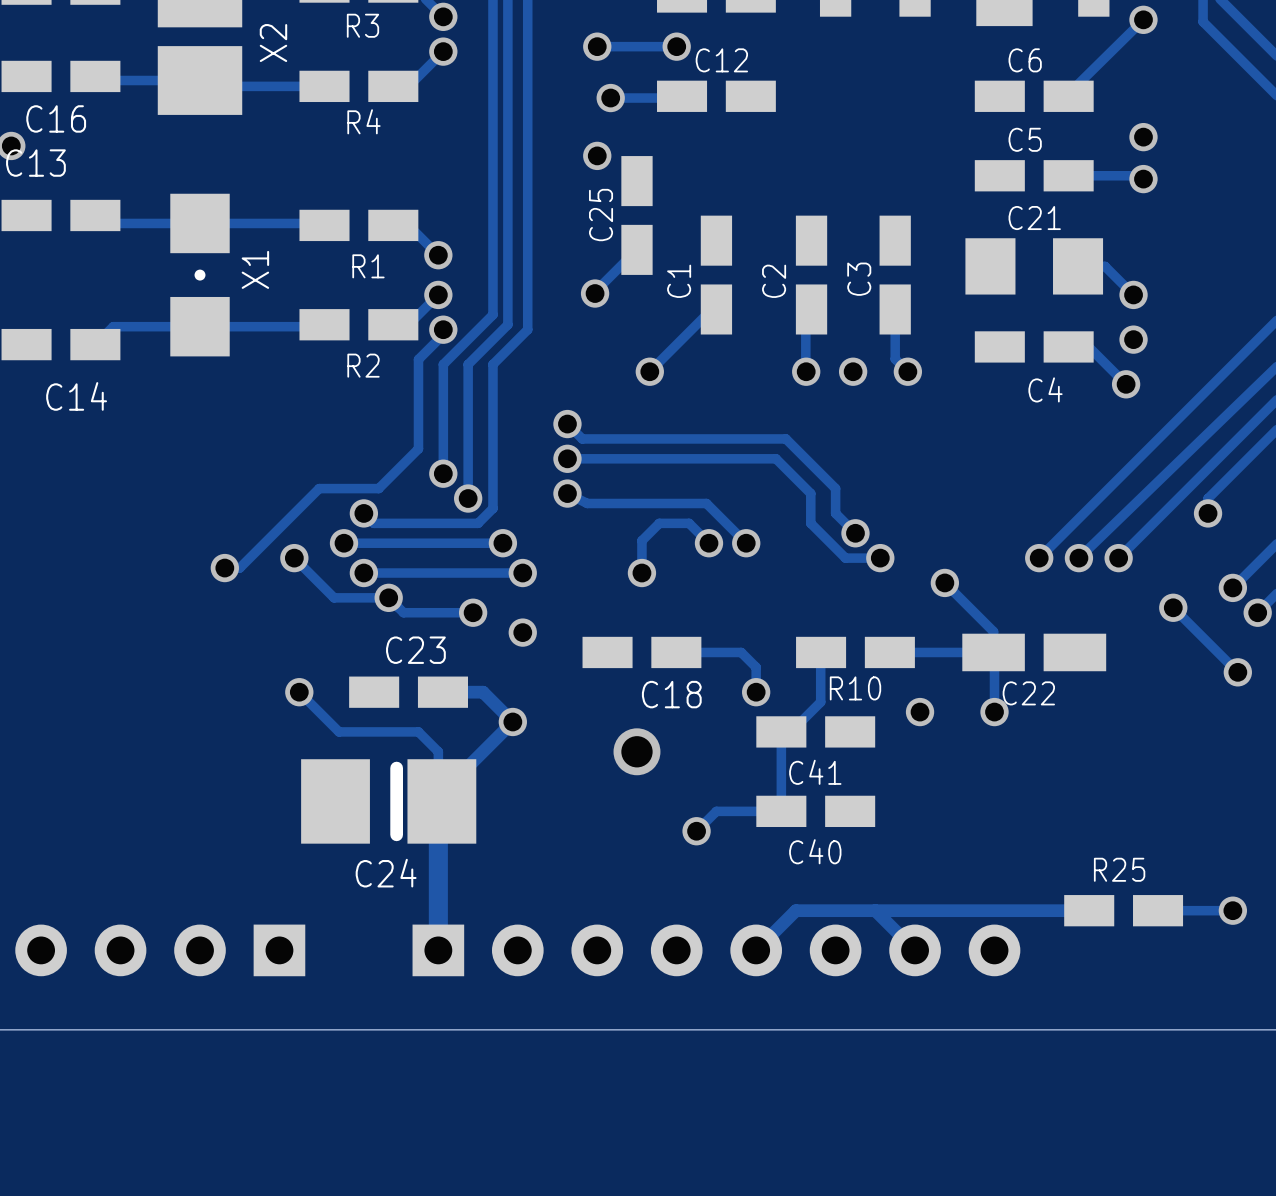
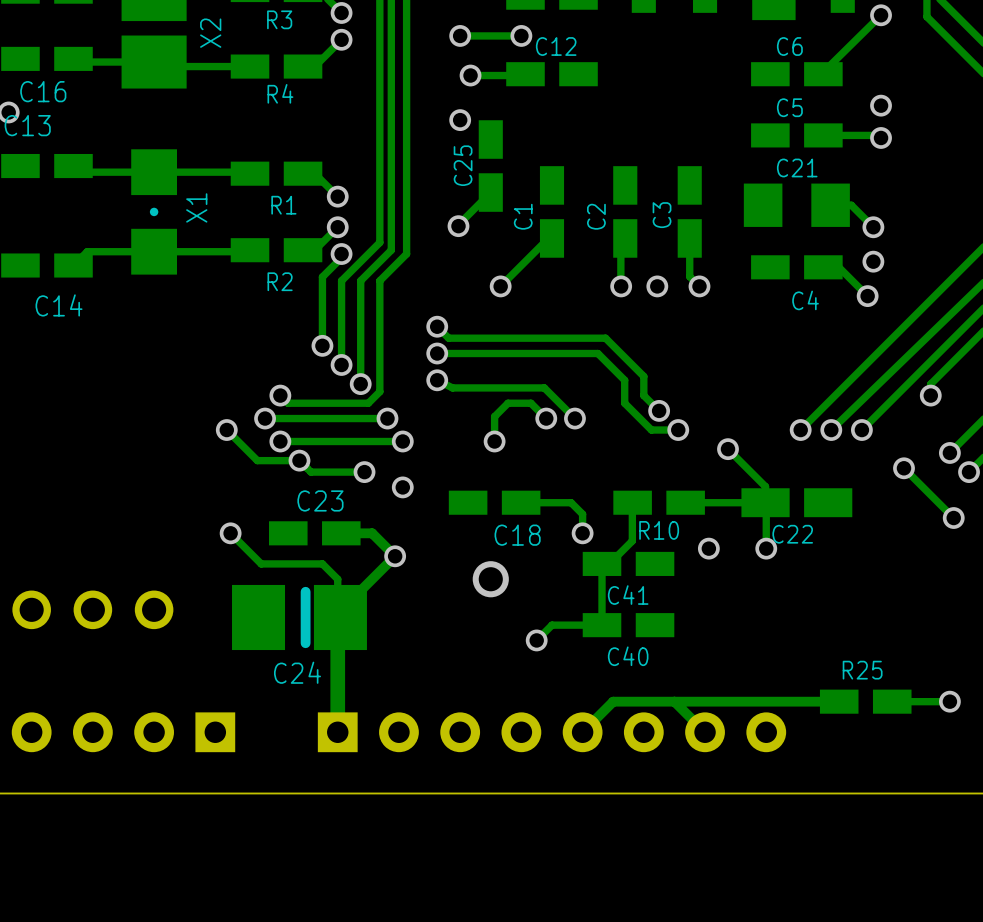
track: (418, 448) (378, 488) (319, 488) (239, 568) (224, 568) -> none
via: none -> (322, 345)
via: (224, 568) -> none
part: none -> (92, 609)

